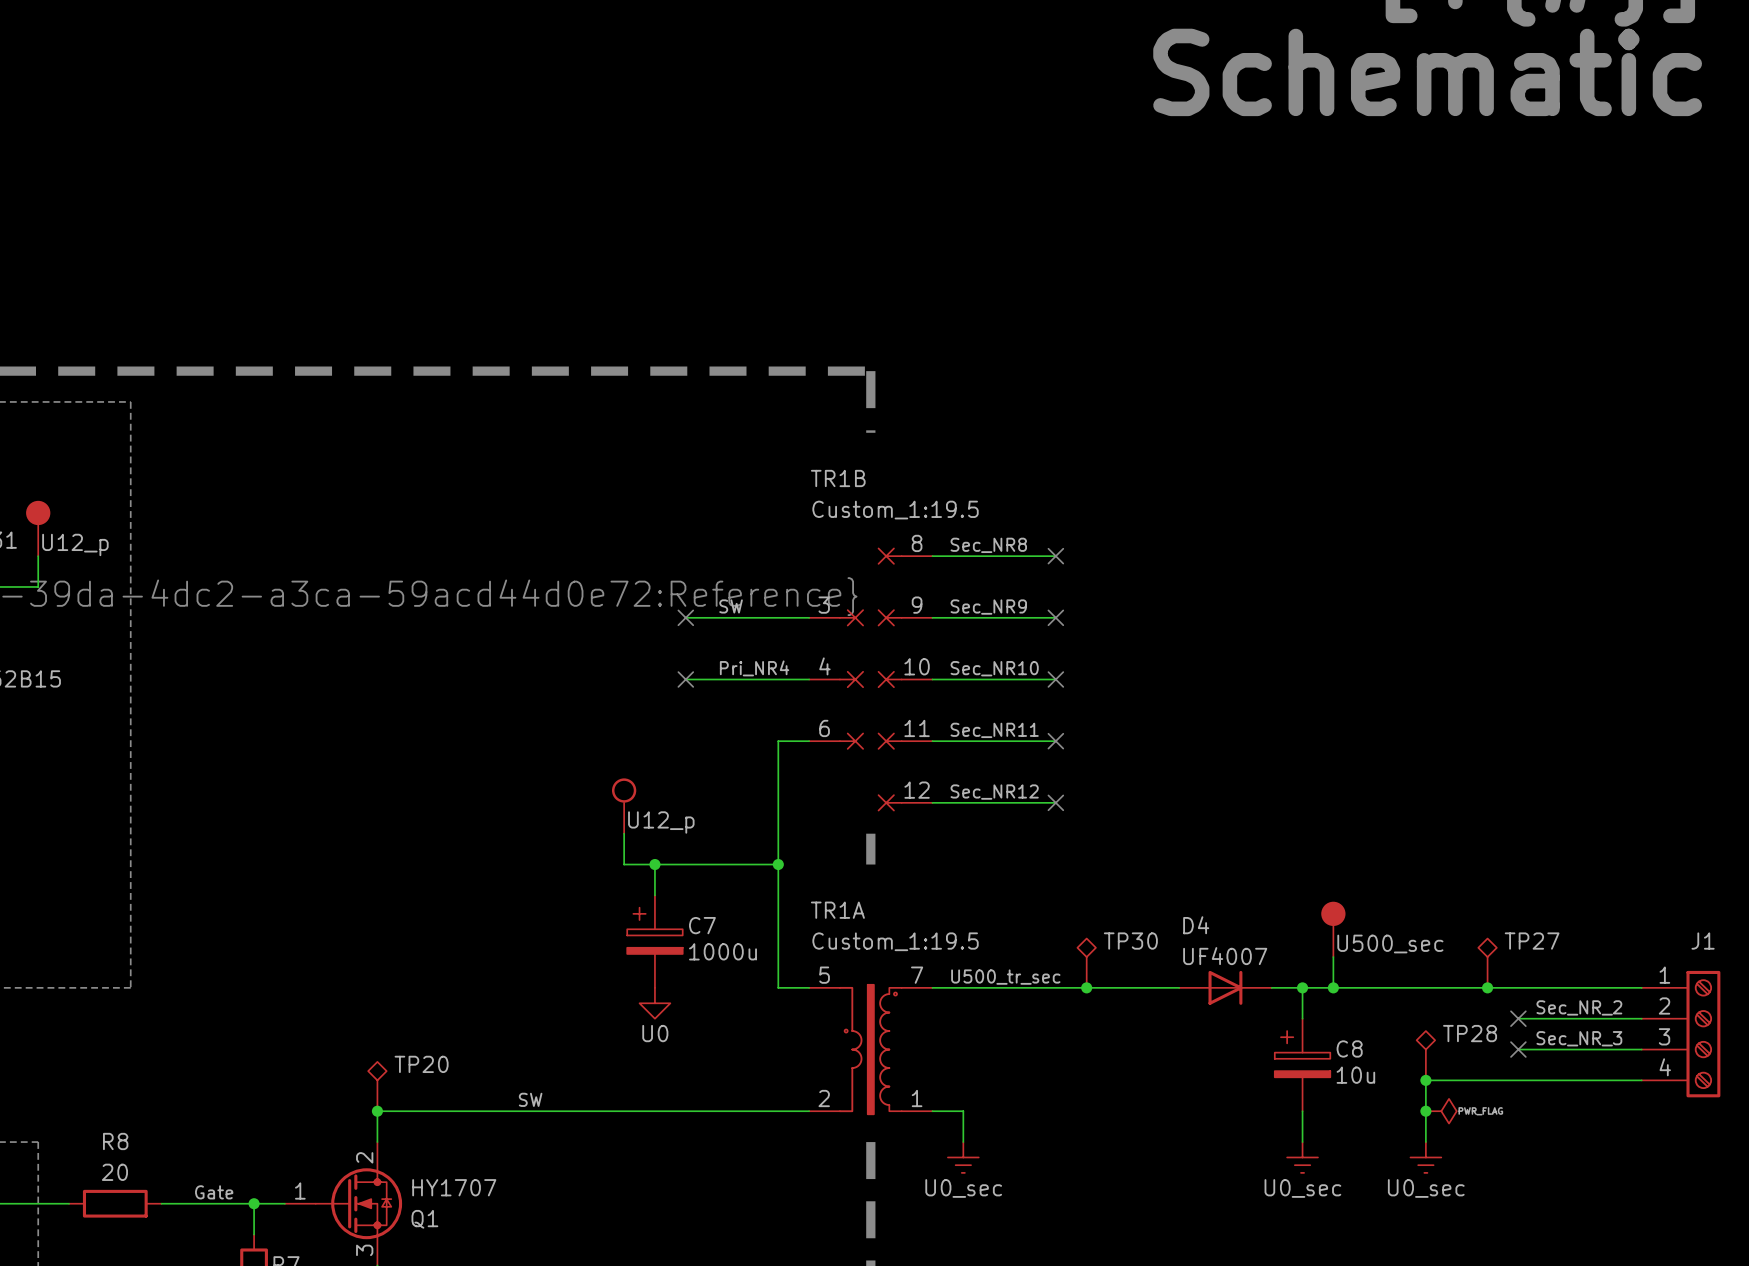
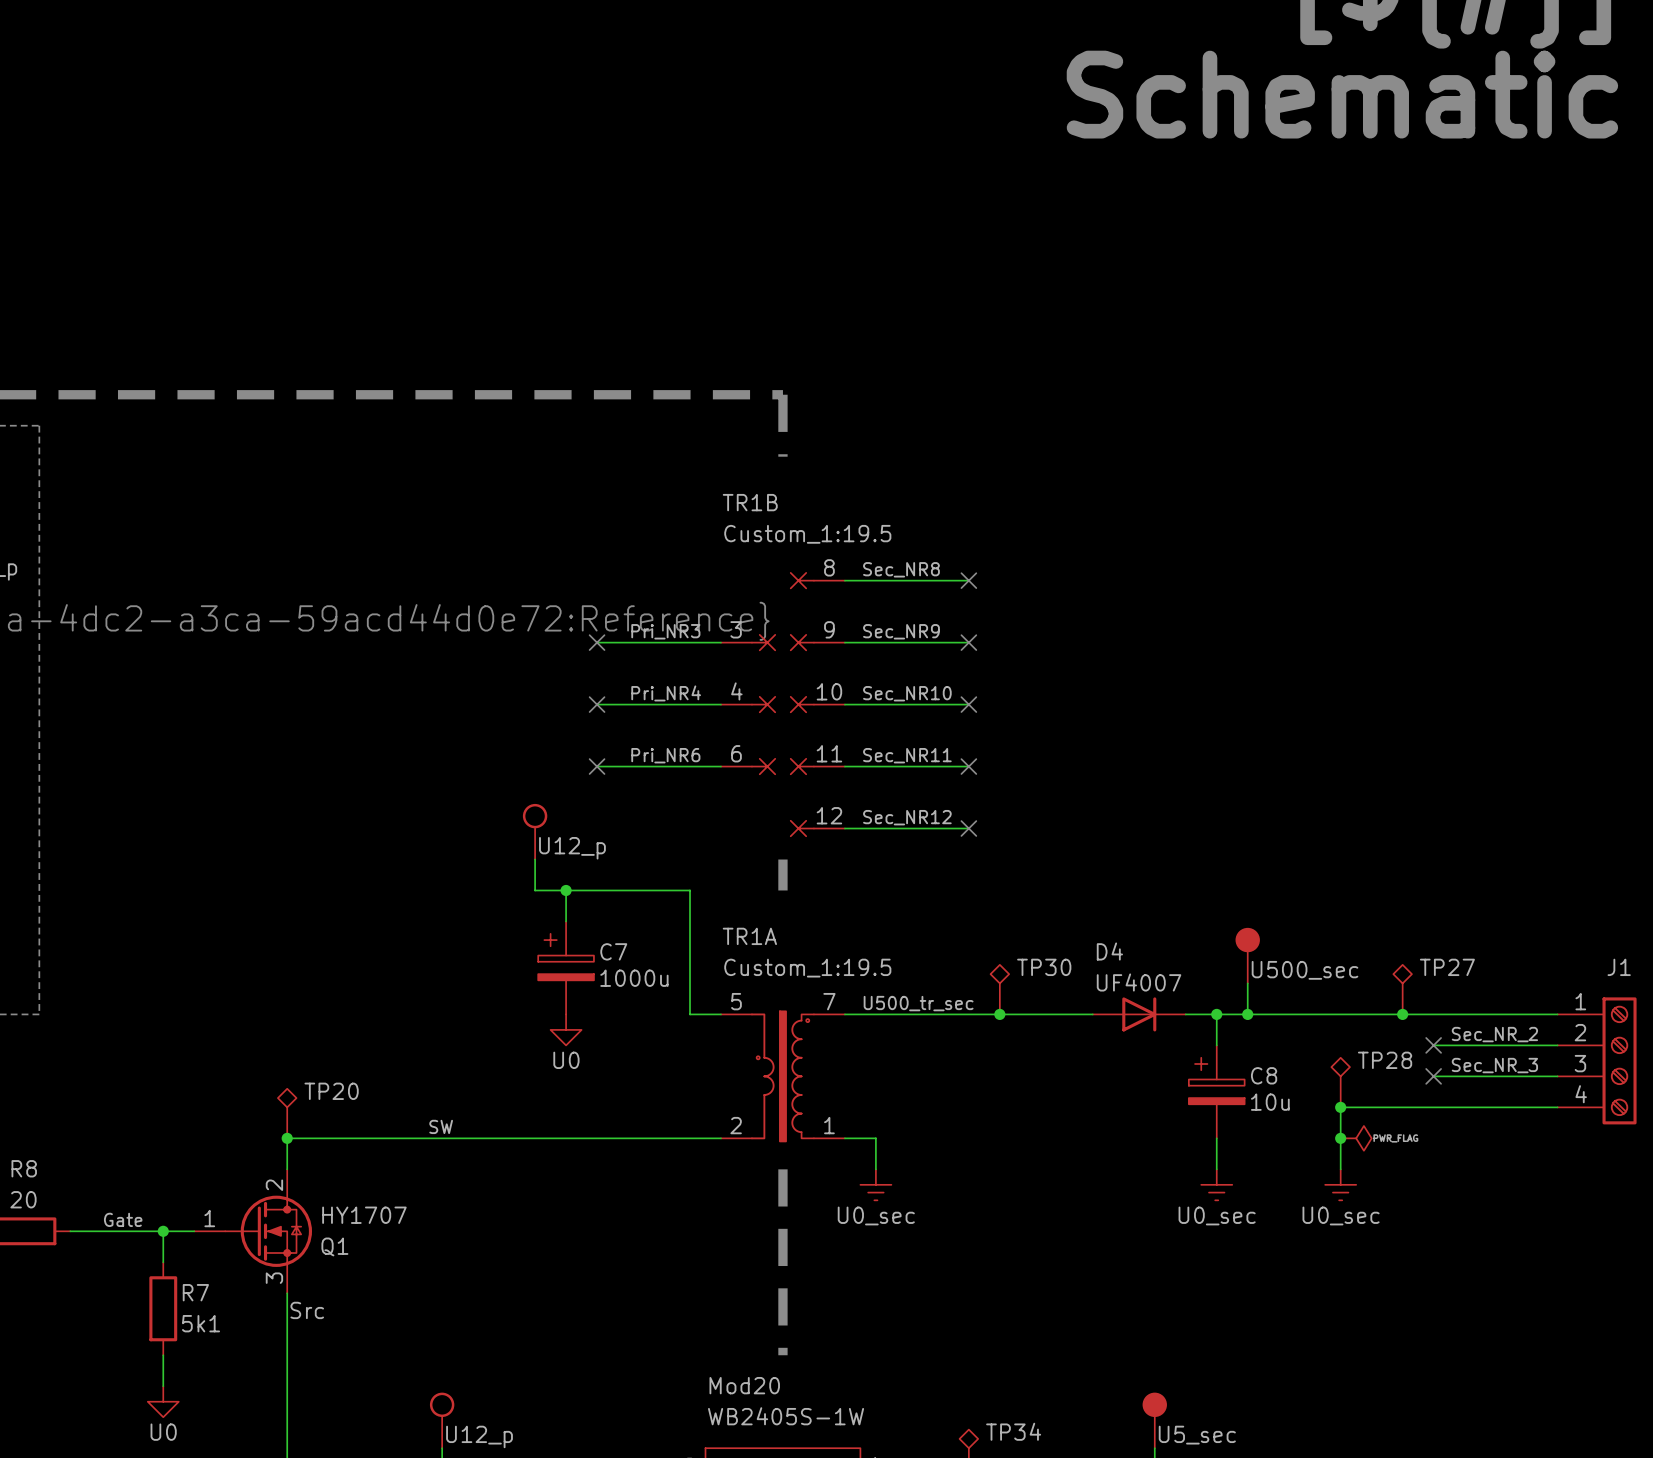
label: SW (731, 606) -> Pri_NR3 (665, 631)
label: none -> Pri_NR6 (665, 755)
no-connect mark: none -> (597, 766)
wire: (778, 741) (778, 864) -> (690, 766) (597, 766)
junction: (778, 864) -> none

